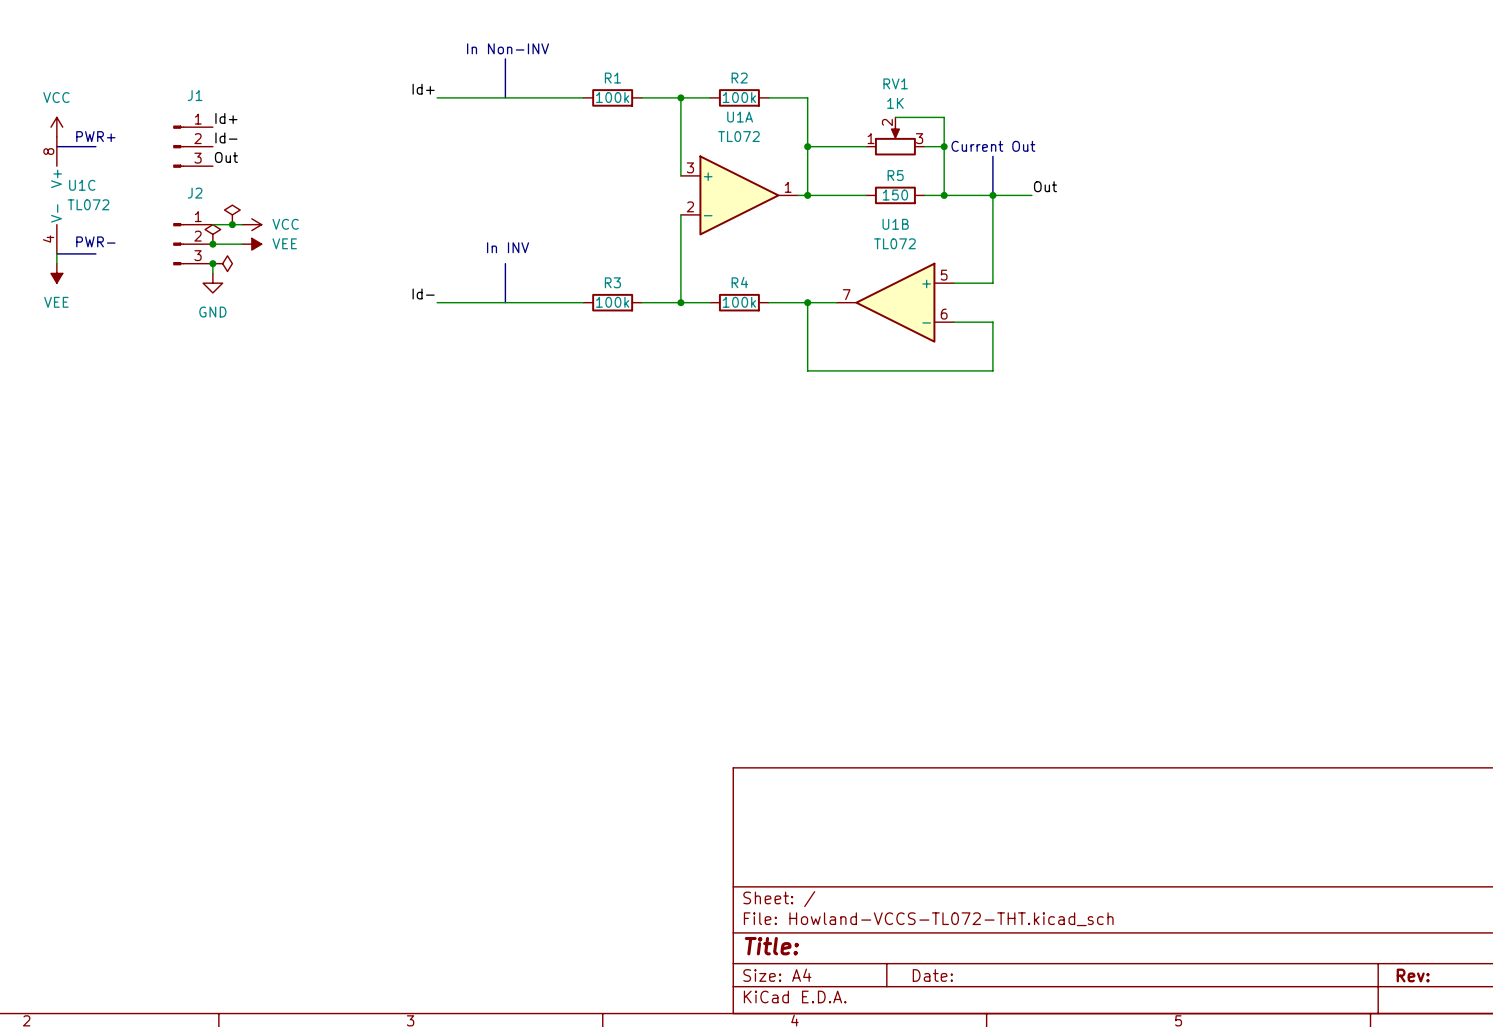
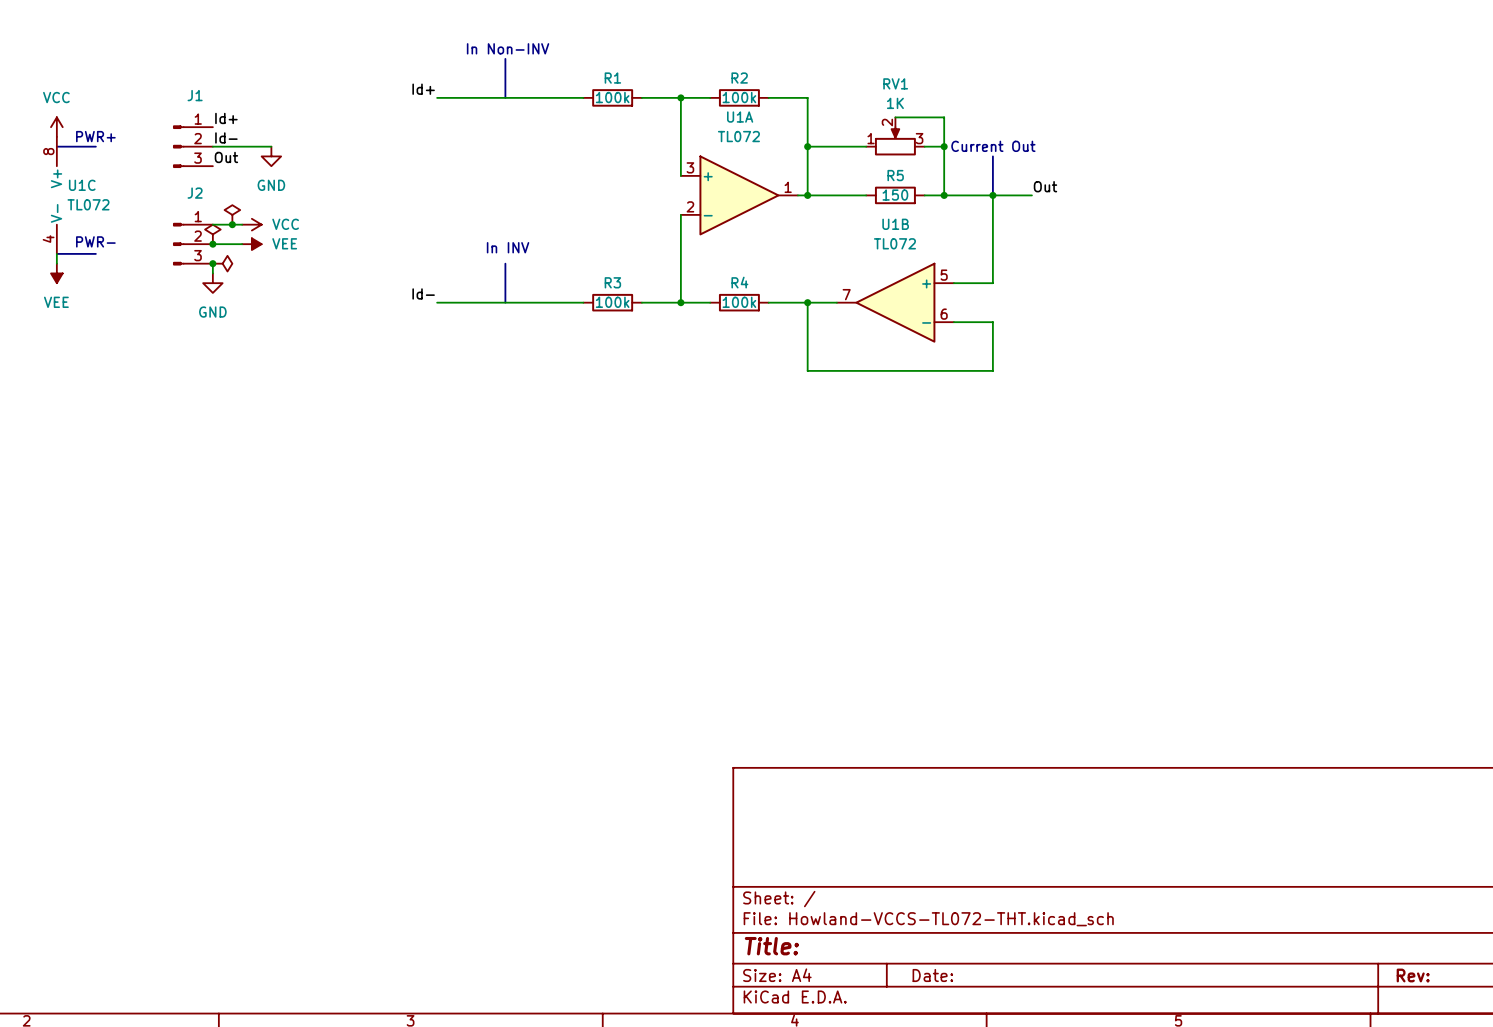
wire: none -> (212, 146) (271, 146)
power symbol: none -> GND (271, 156)

